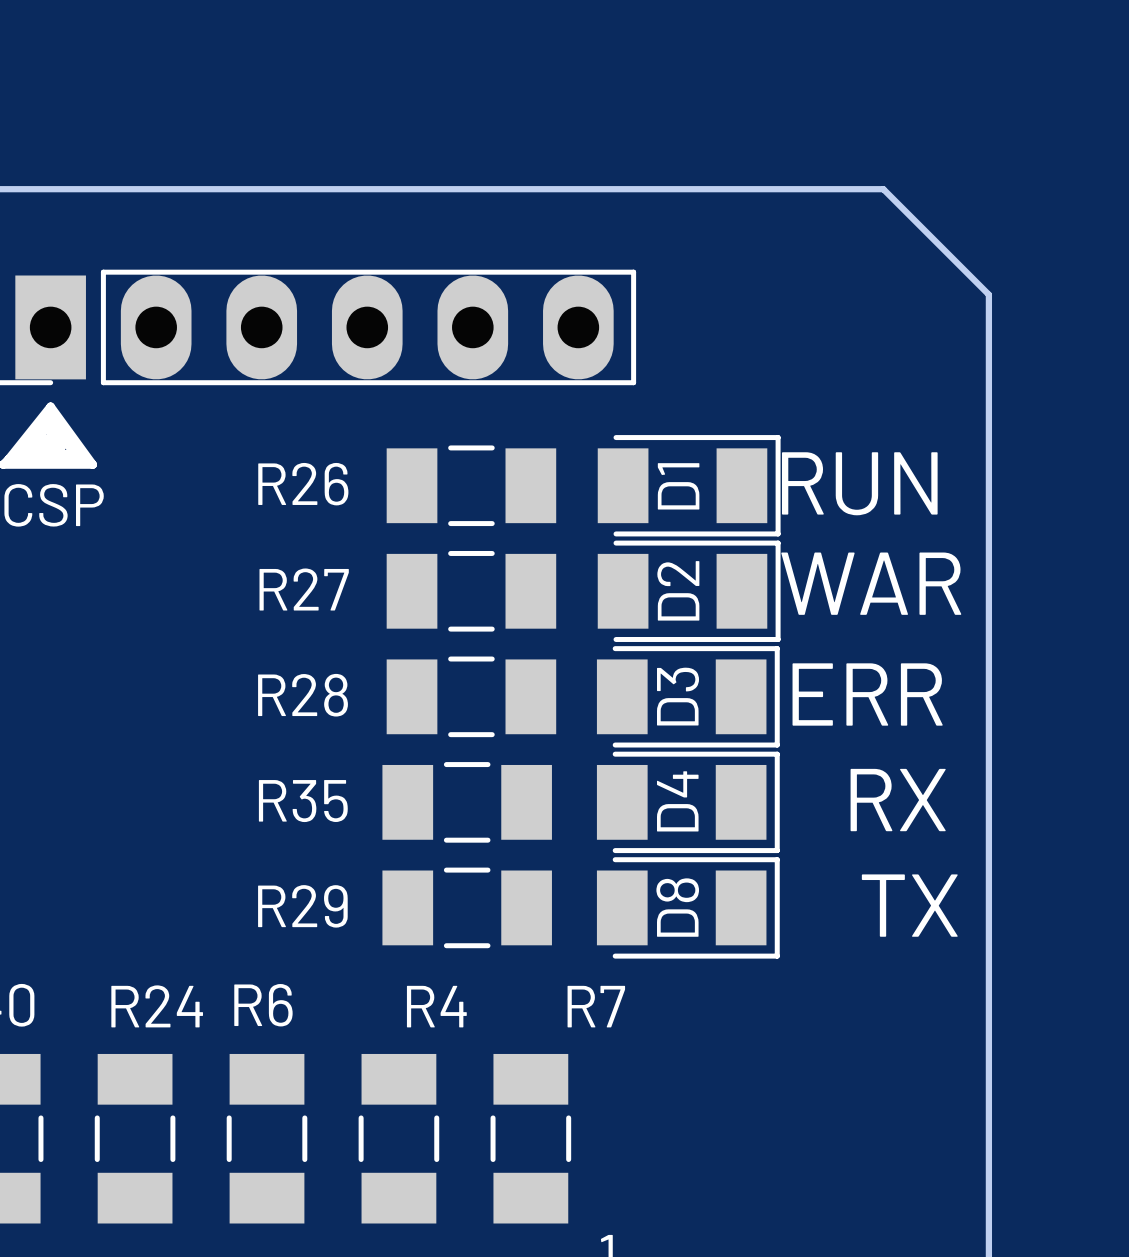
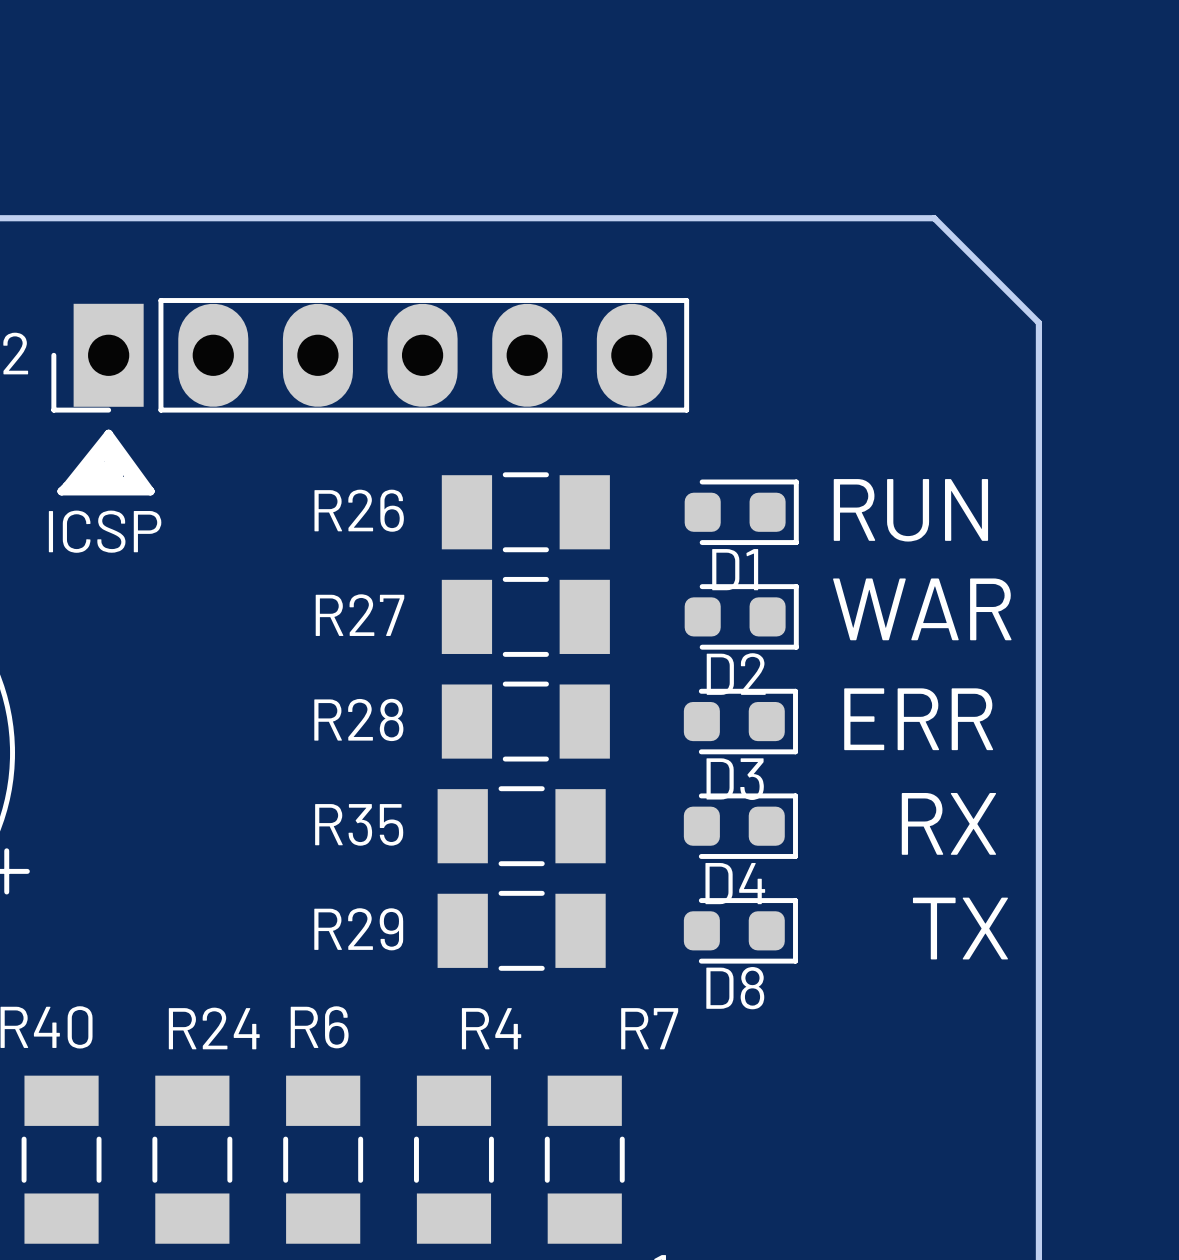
D1 footprint: [597, 435, 781, 537] -> [684, 479, 799, 546]
D2 footprint: [597, 540, 781, 642] -> [684, 584, 799, 650]
D3 footprint: [596, 646, 780, 748] -> [683, 688, 798, 755]
D4 footprint: [596, 751, 780, 854] -> [683, 793, 798, 859]
D8 footprint: [596, 857, 780, 959] -> [683, 898, 798, 964]

